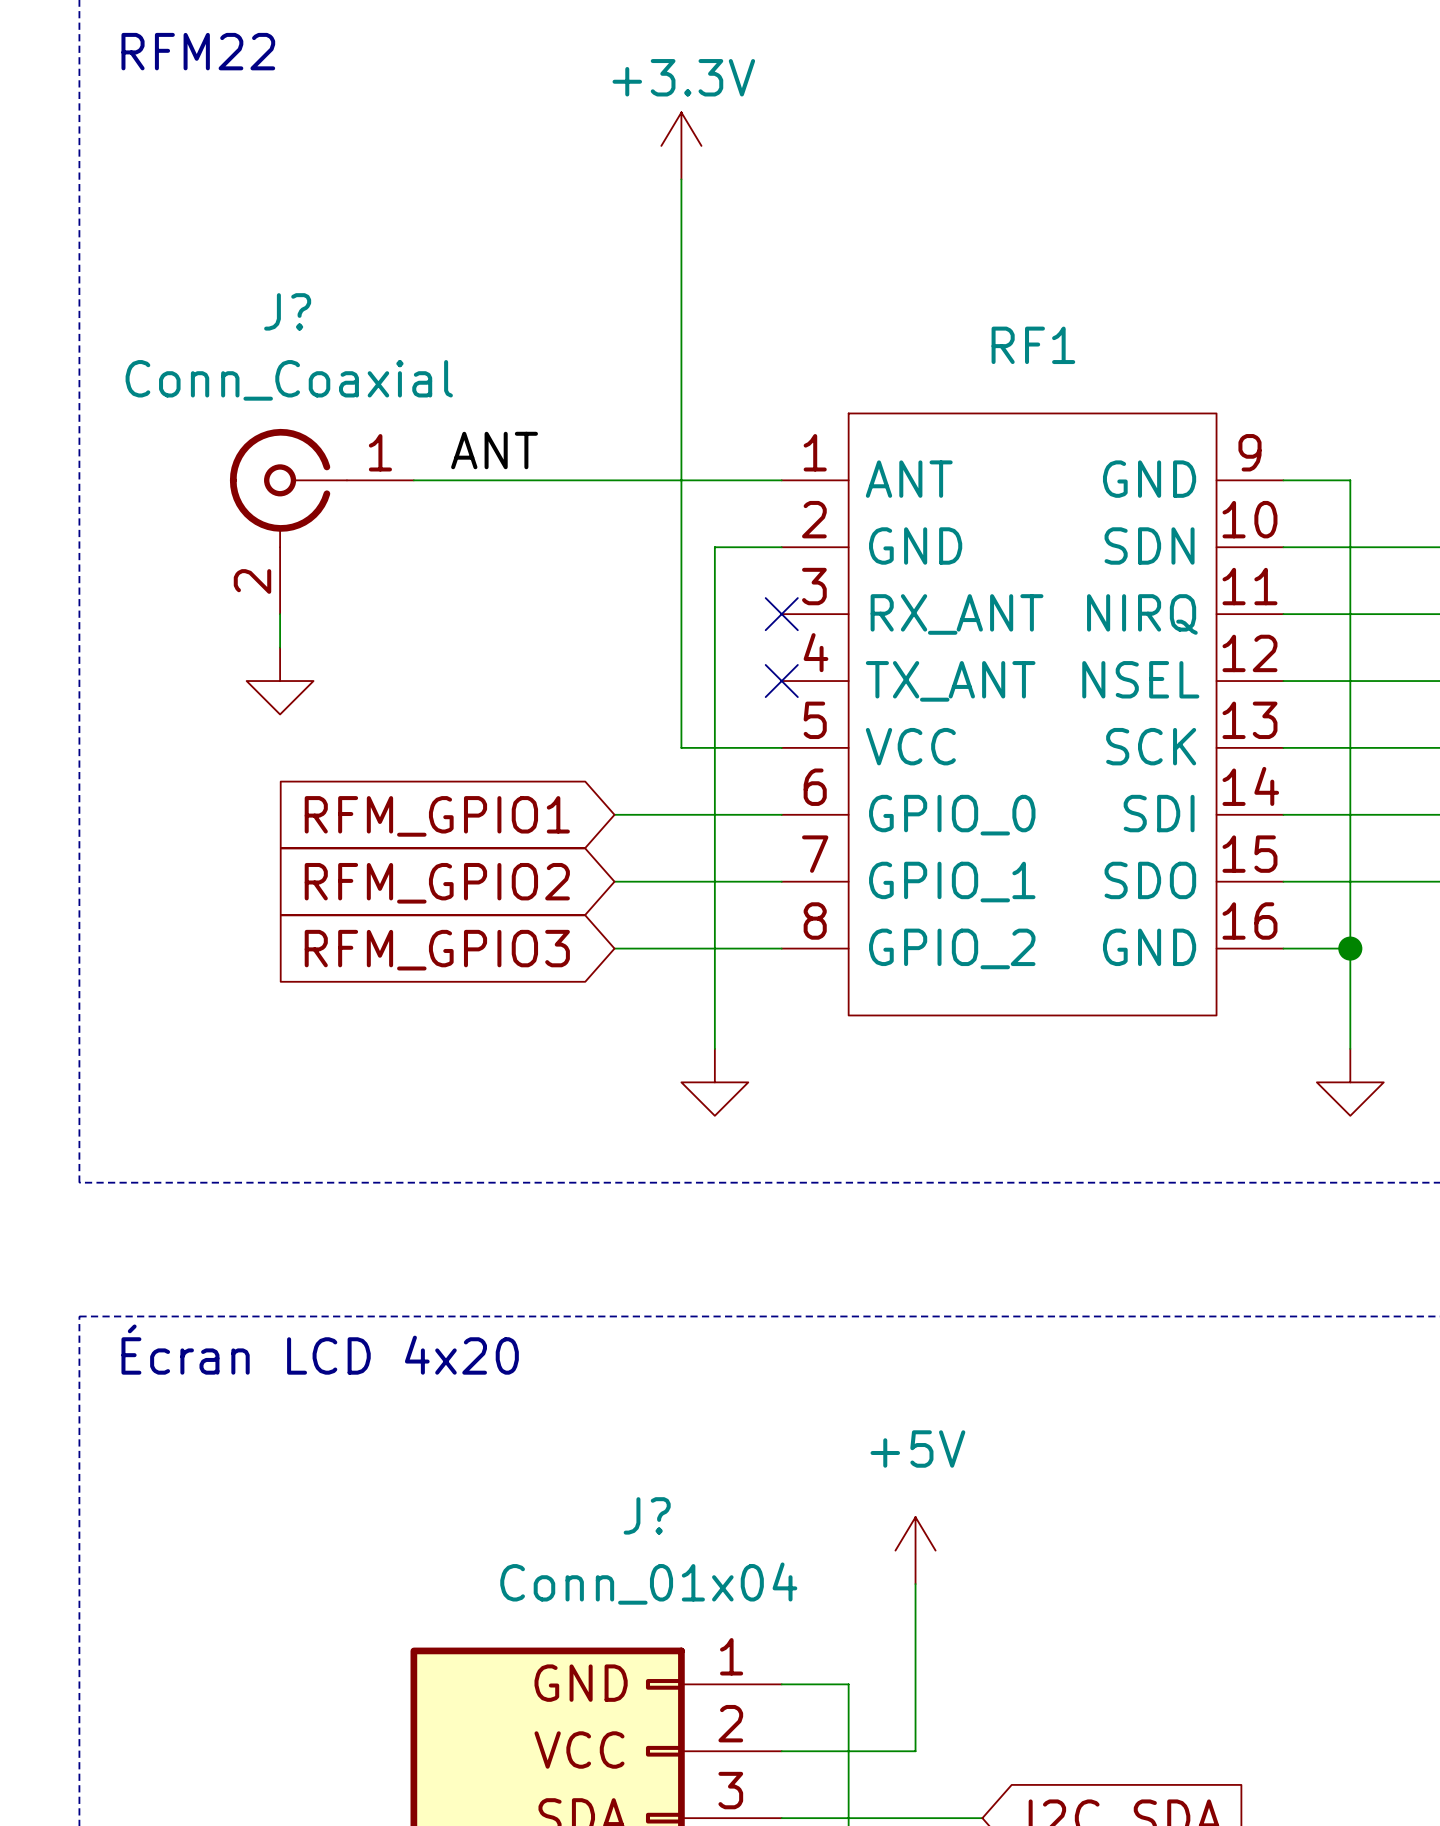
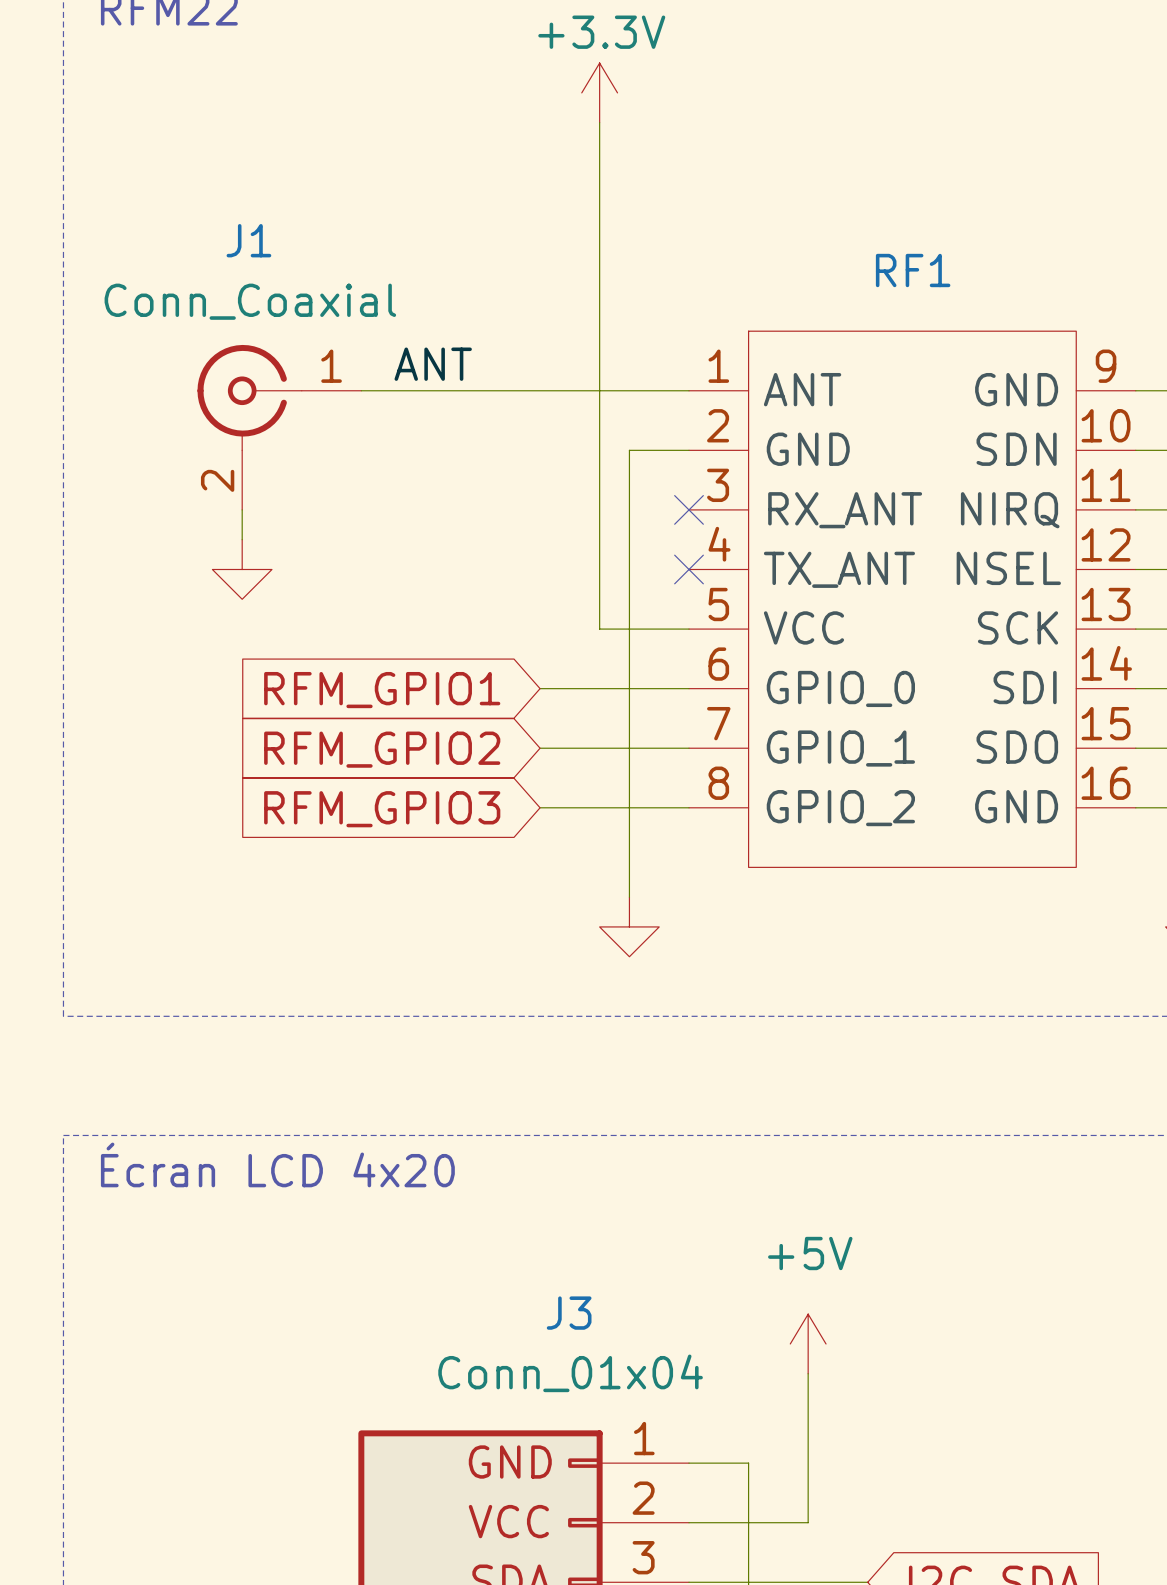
J? name: J? (287, 311) -> J1 (248, 240)
J? name: J? (647, 1515) -> J3 (569, 1313)

